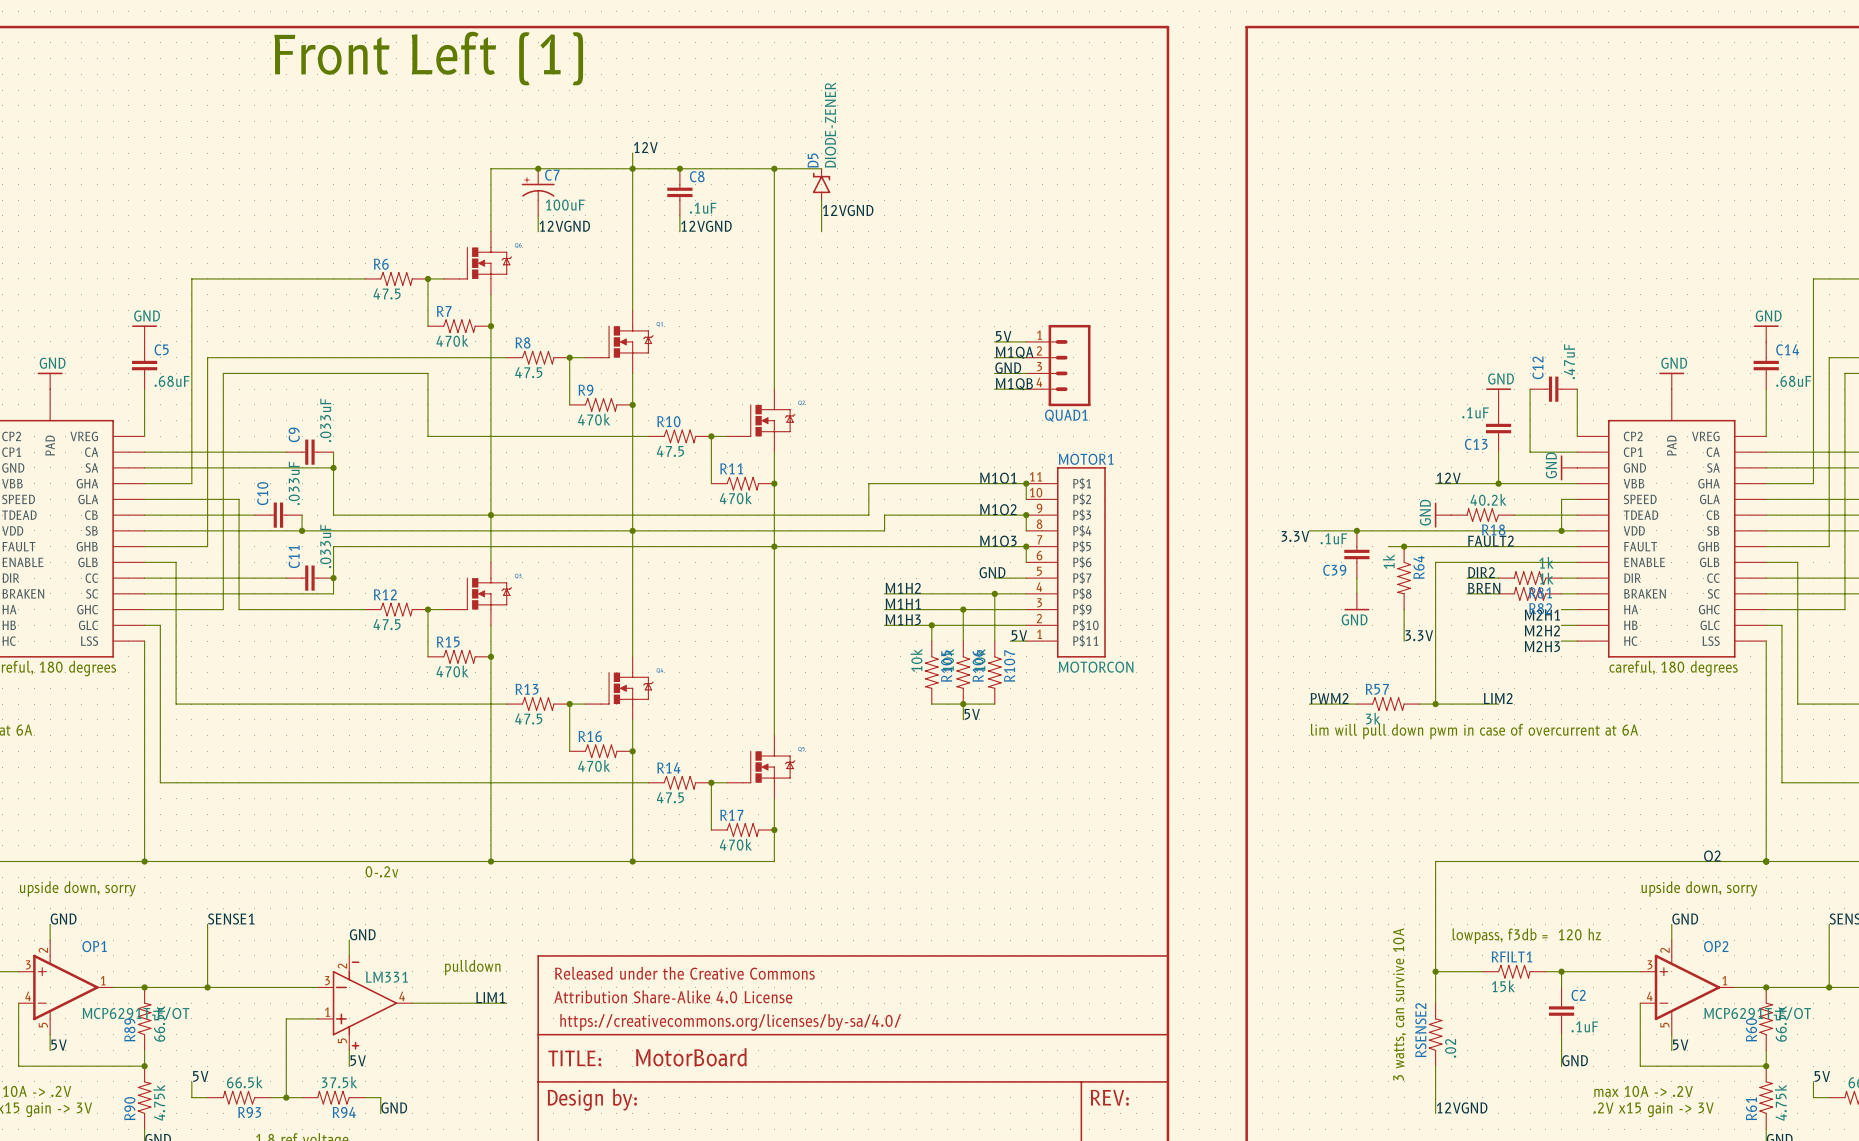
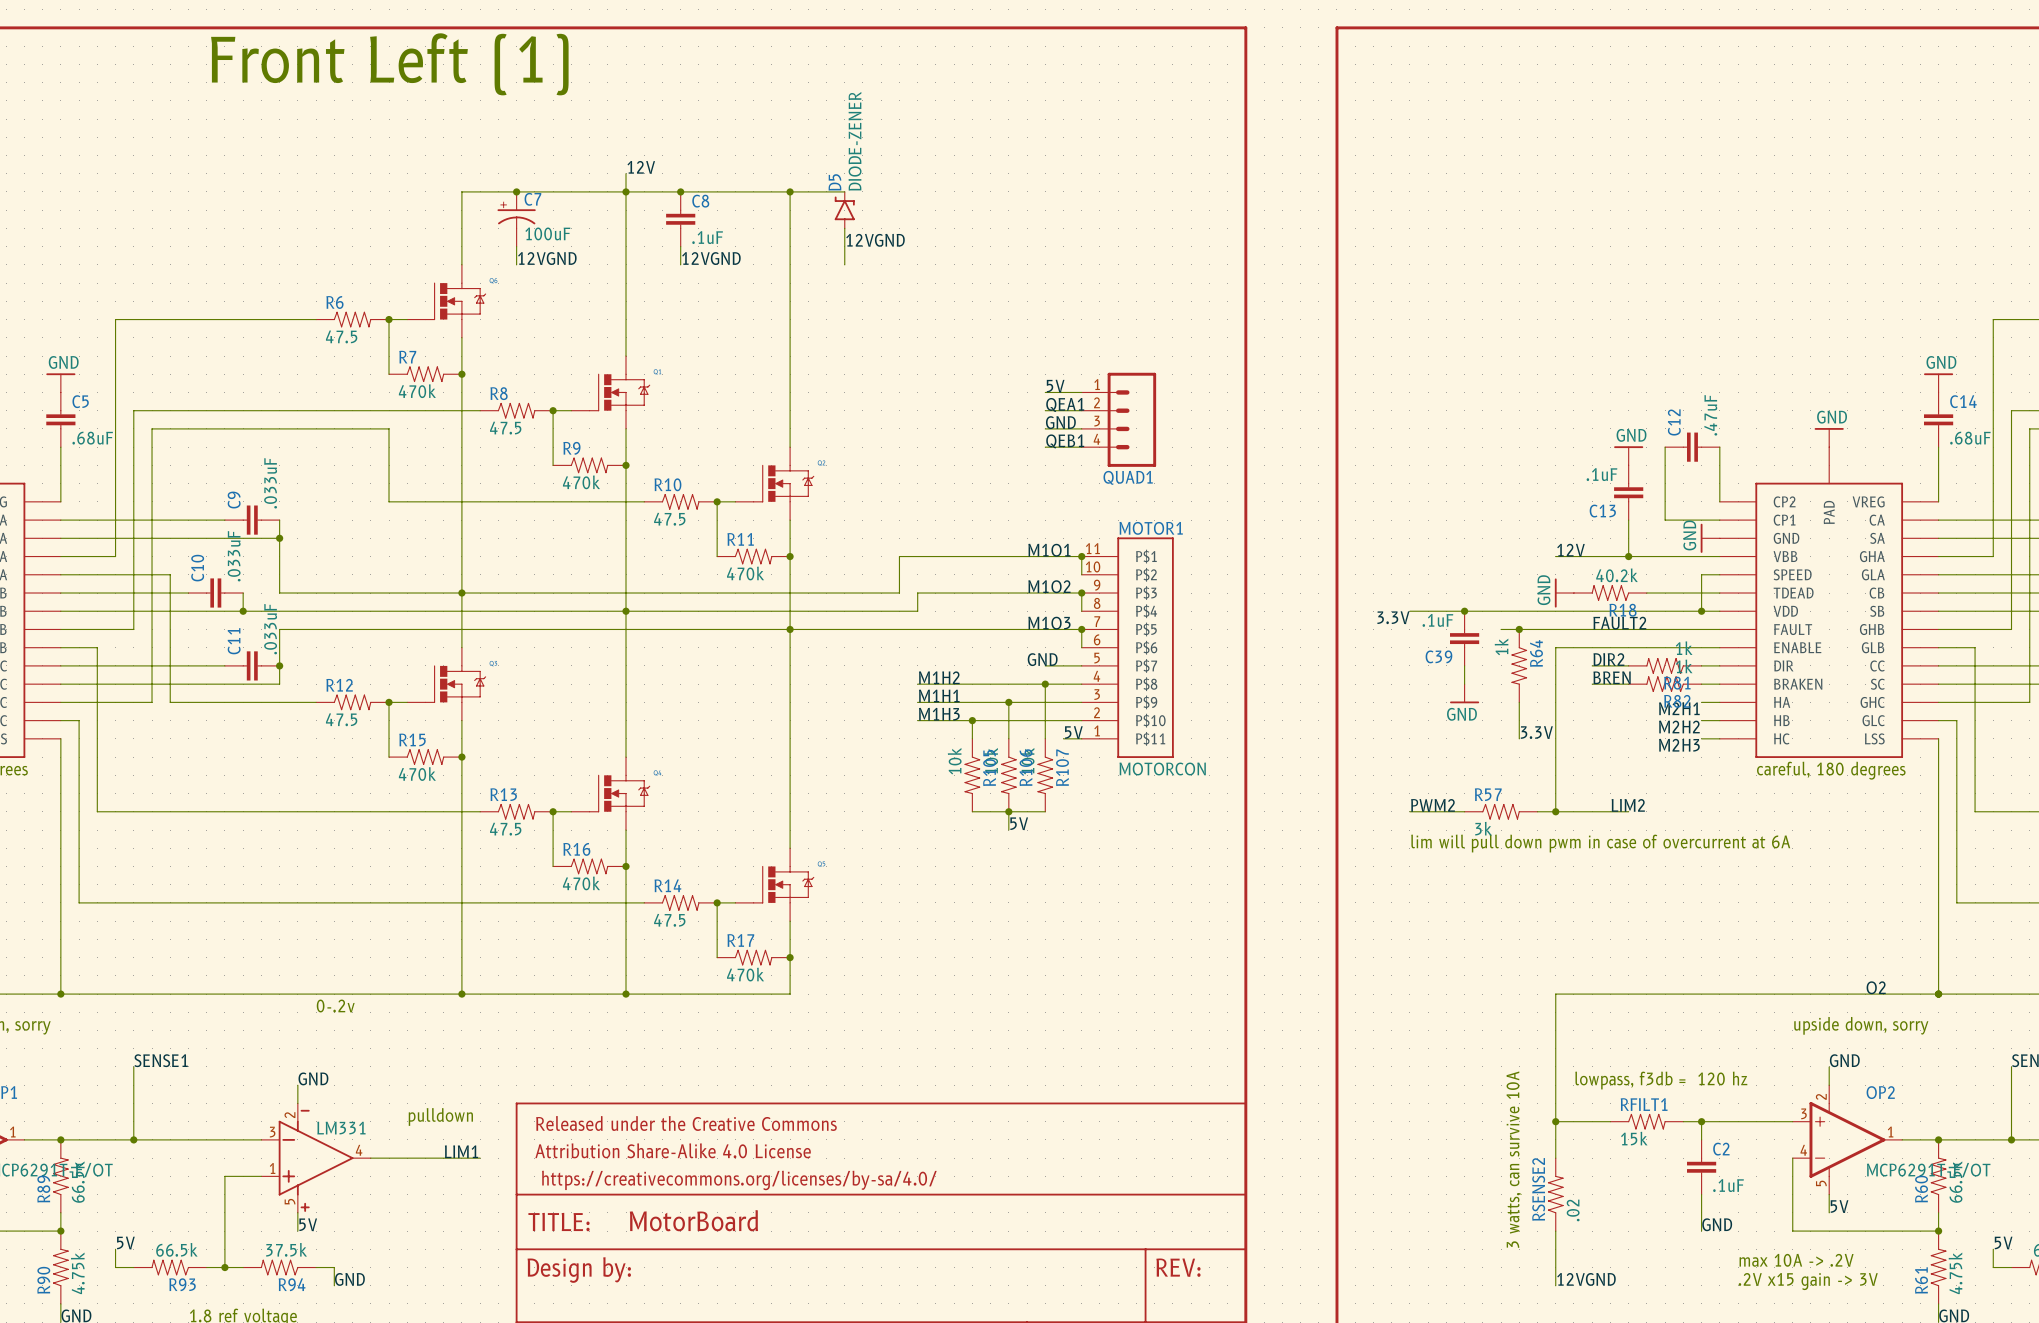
label: M1QA (1014, 352) -> QEA1 (1065, 404)
label: M1QB (1014, 384) -> QEB1 (1065, 441)

